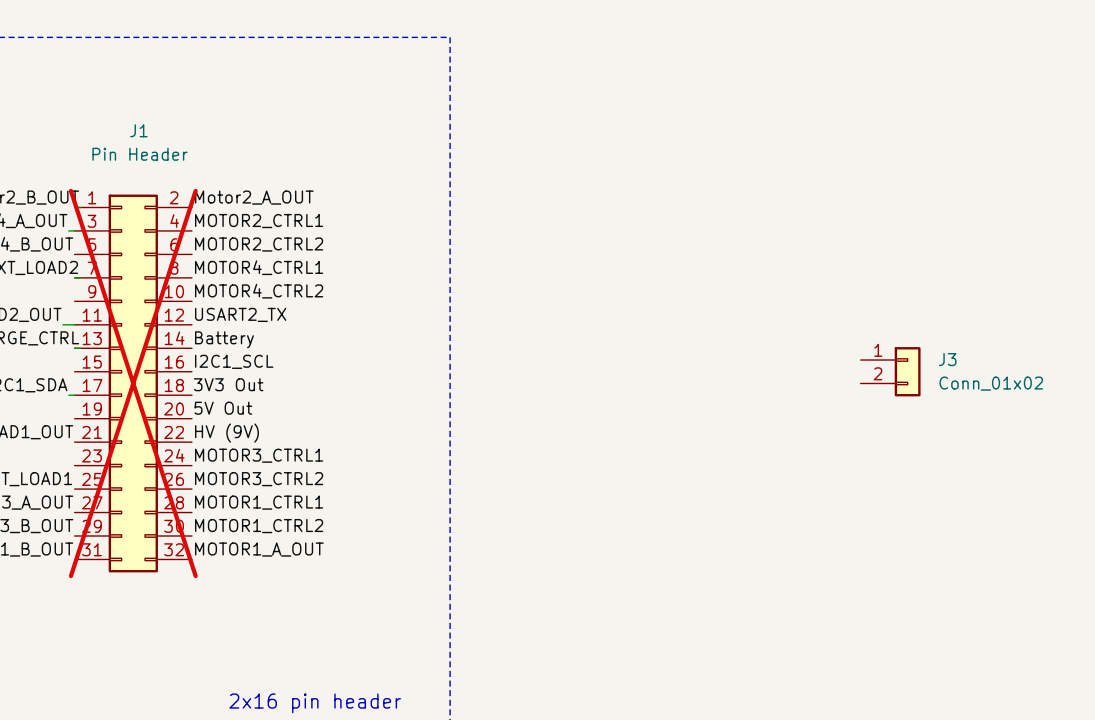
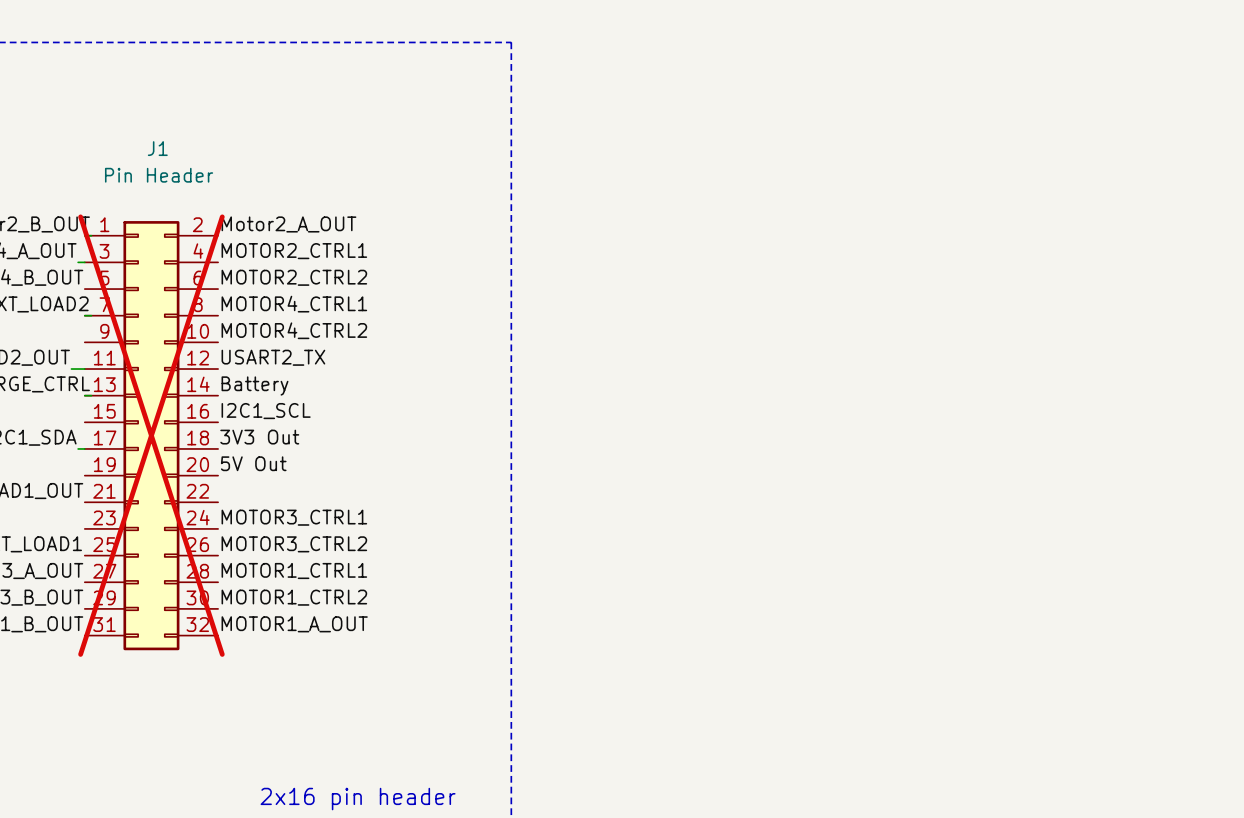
J3: Conn_01x02 (890, 371) -> none
label: HV (9V) (226, 433) -> none

